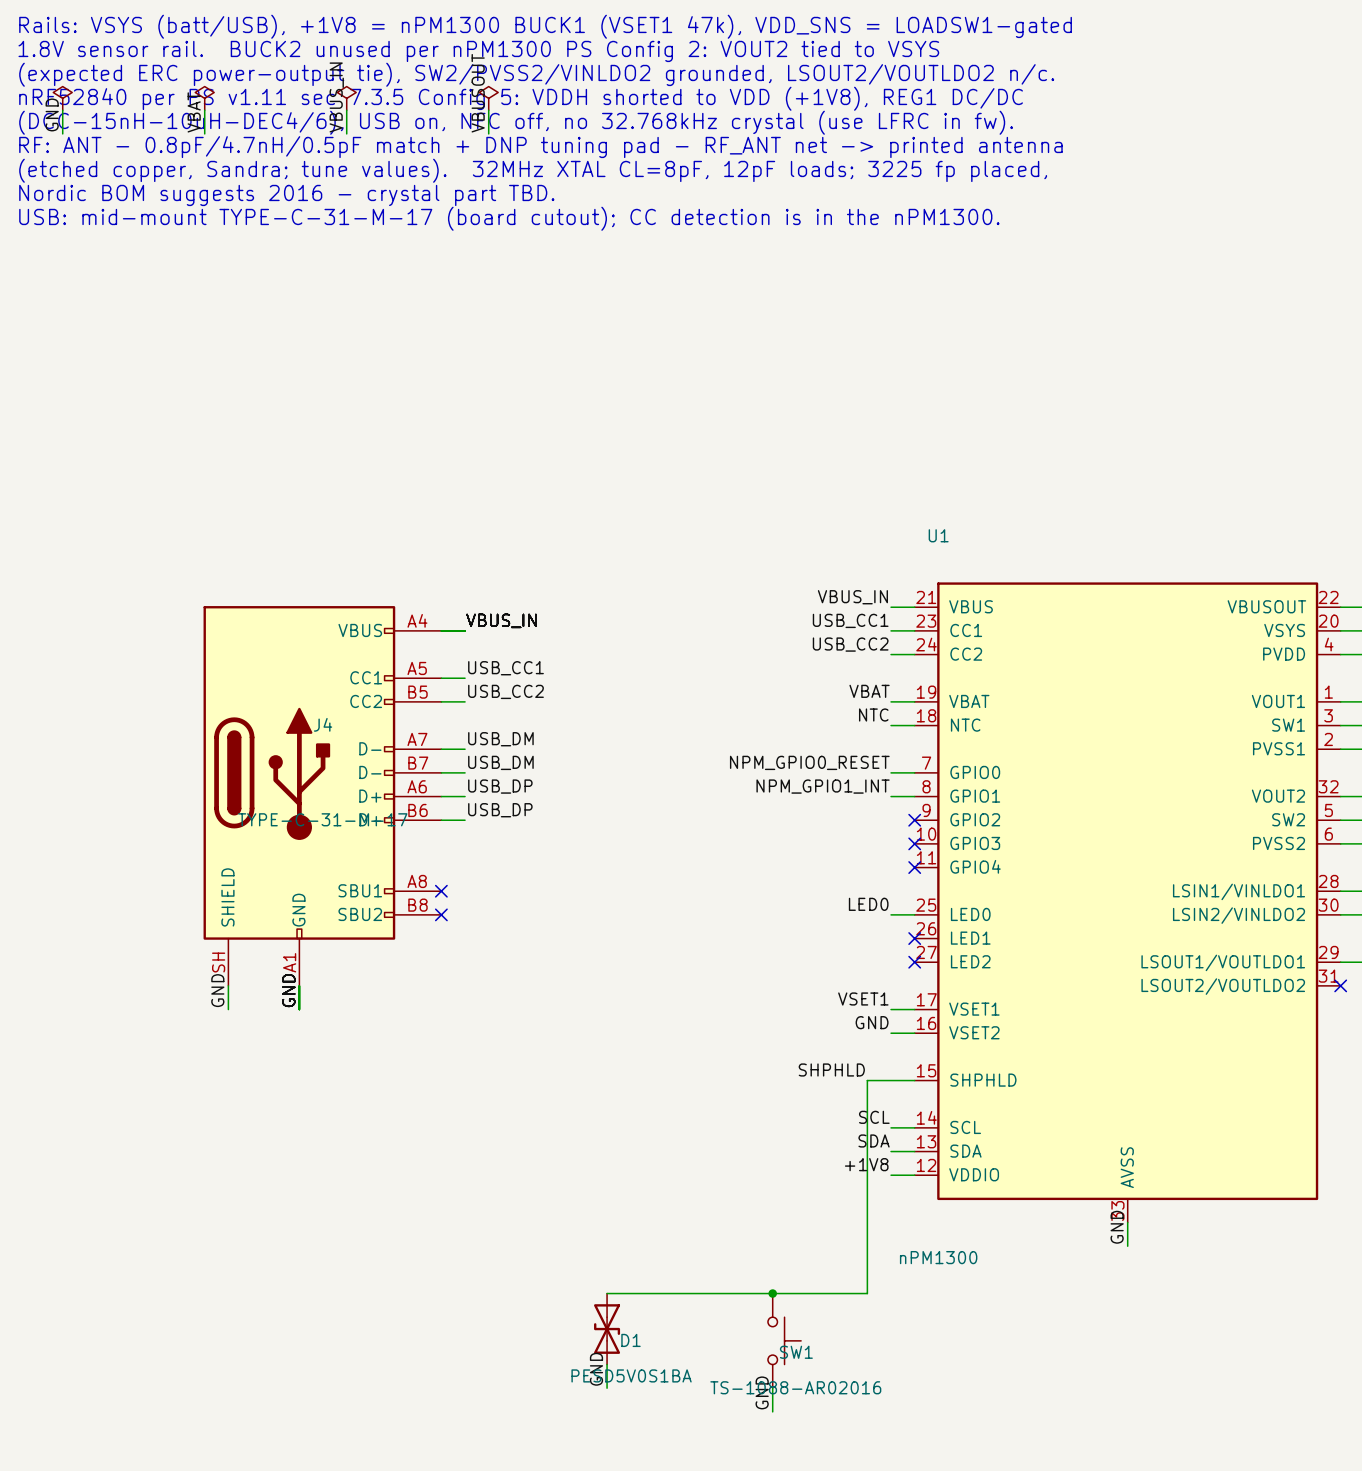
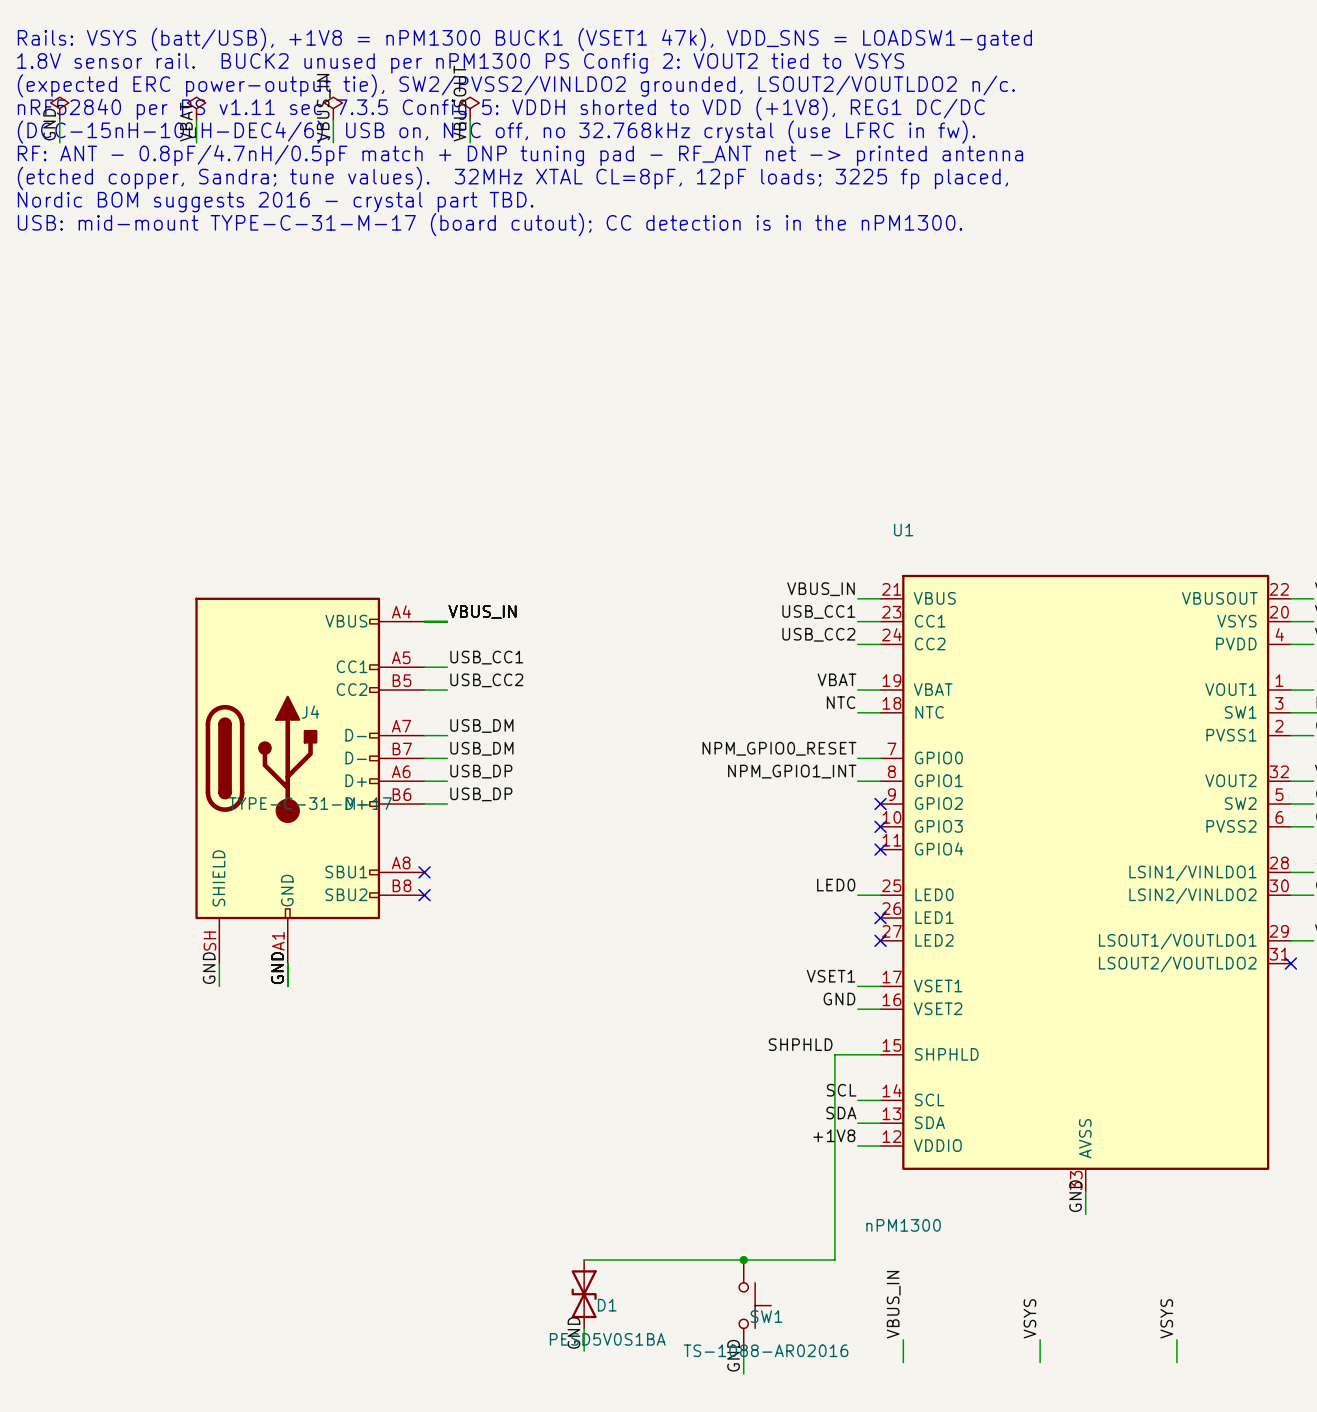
label: none -> VBUS_IN (893, 1304)
label: none -> VSYS (1029, 1318)
label: none -> VSYS (1166, 1318)
wire: none -> (903, 1339) (903, 1362)
wire: none -> (1040, 1339) (1040, 1362)
wire: none -> (1176, 1339) (1176, 1362)

